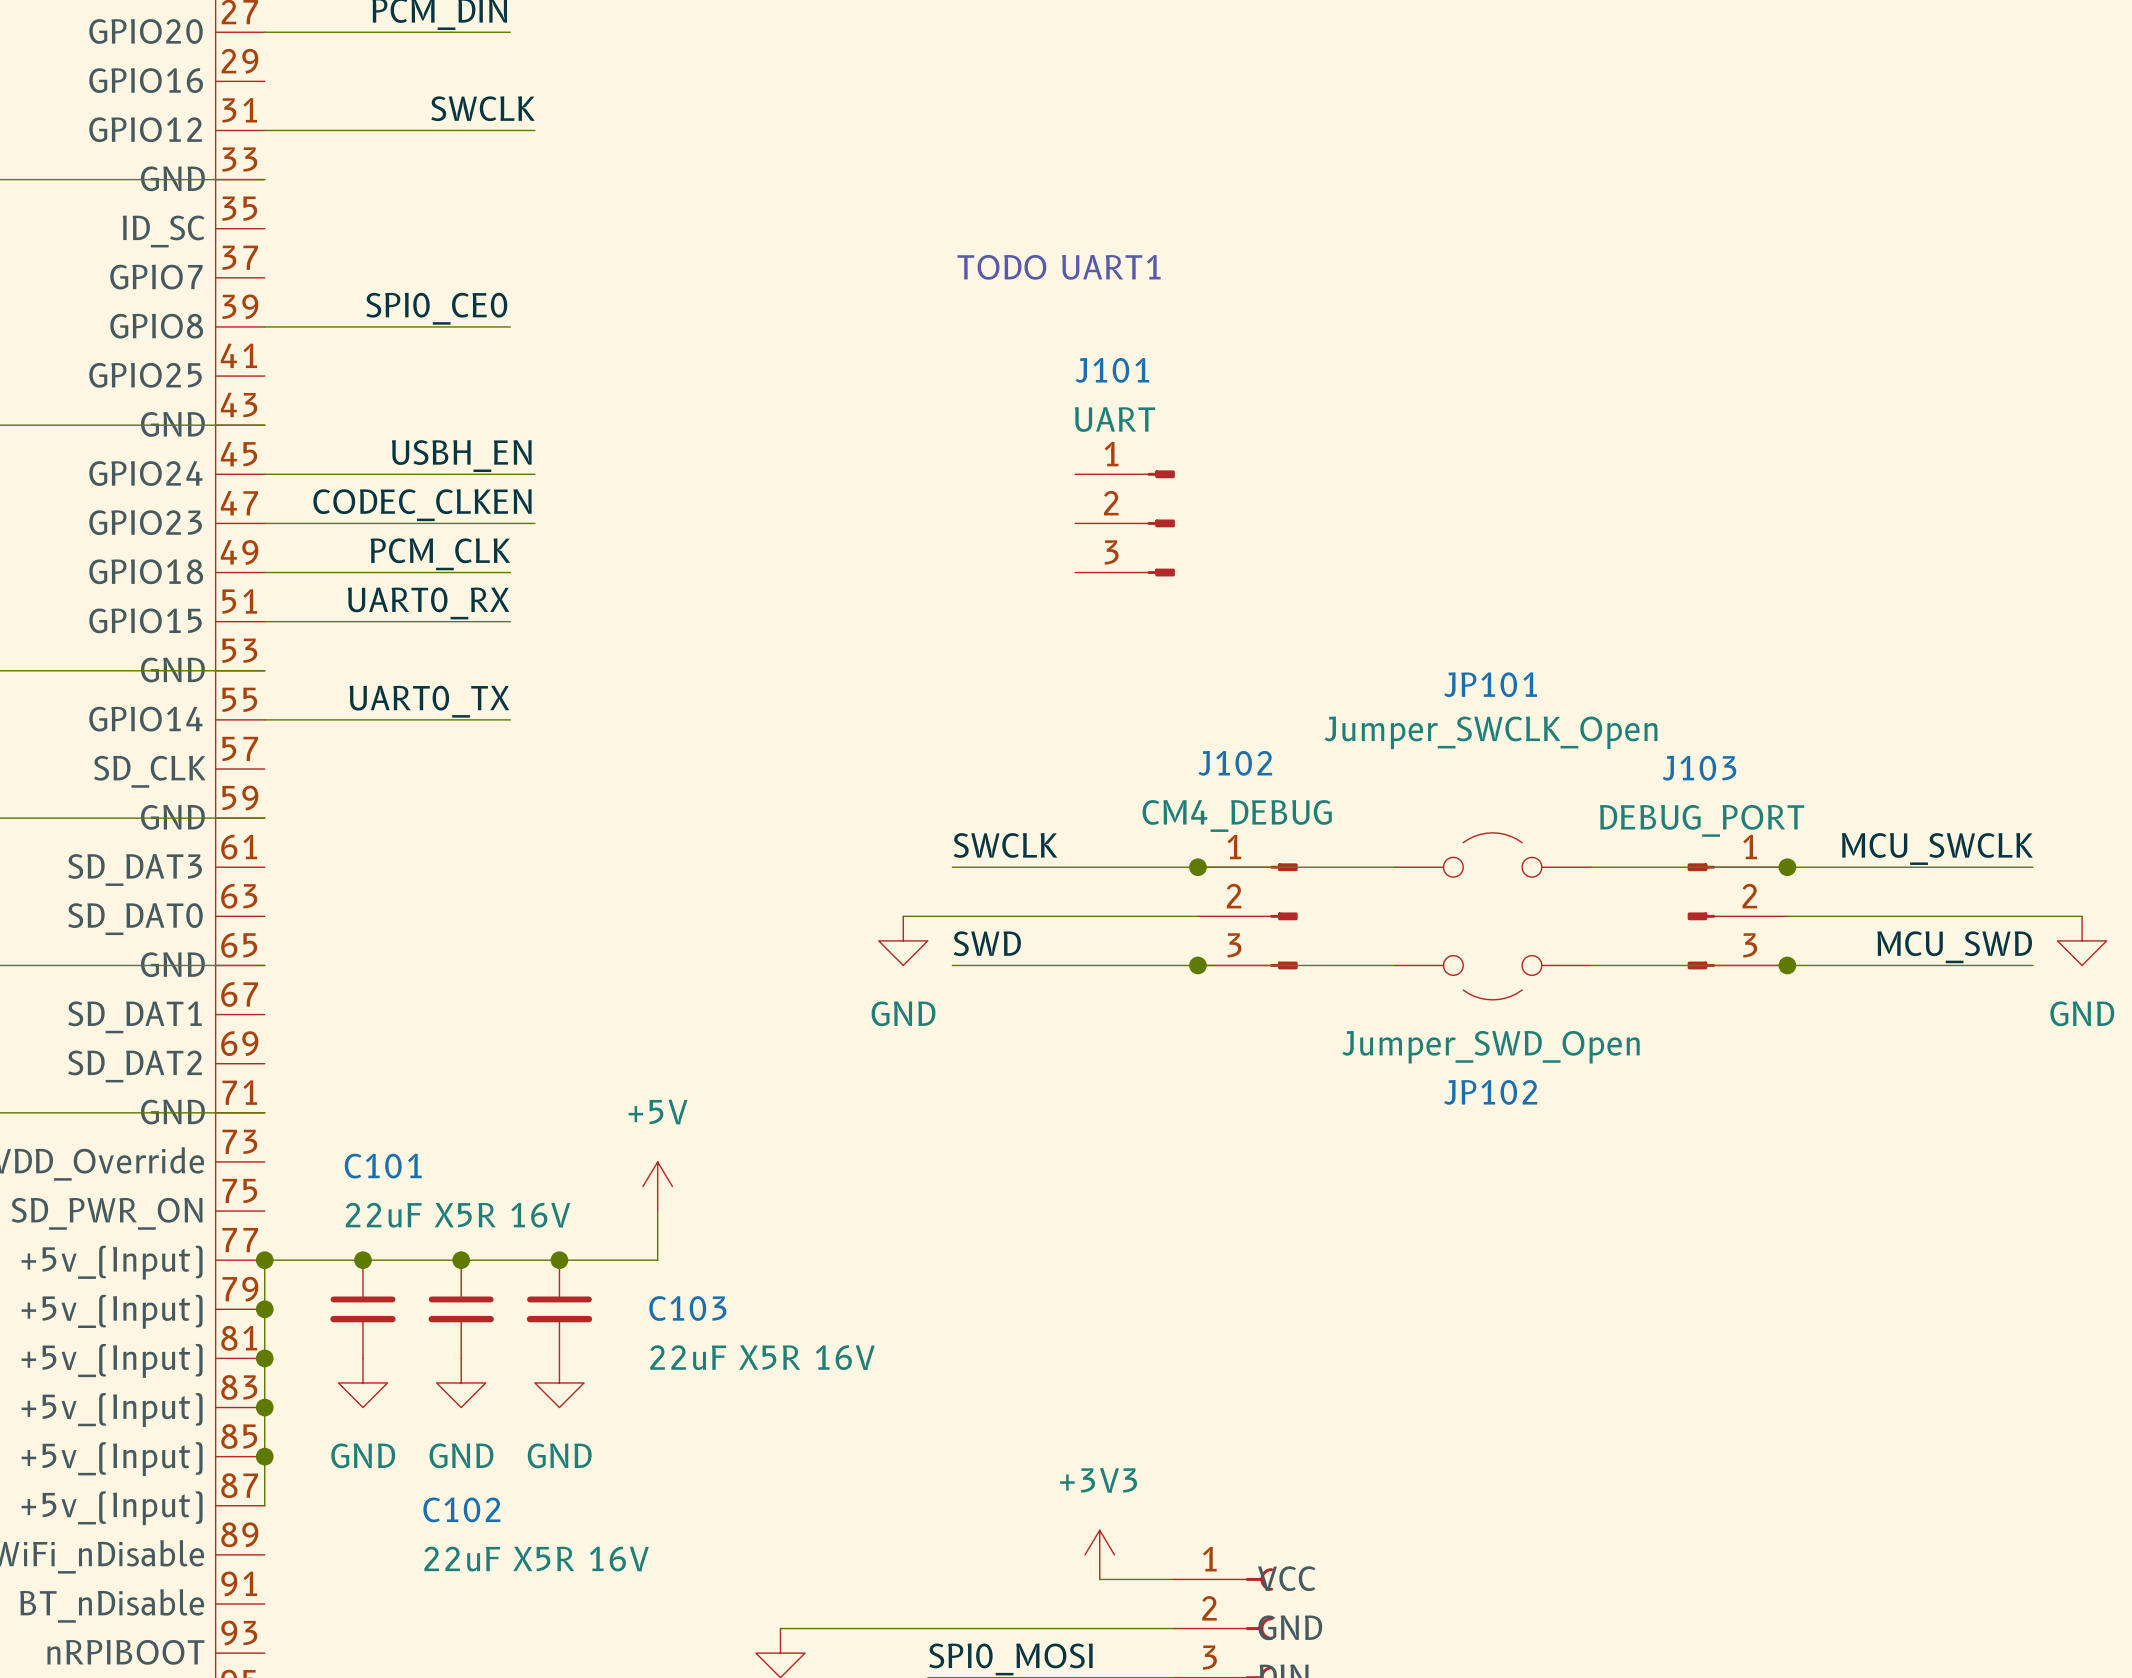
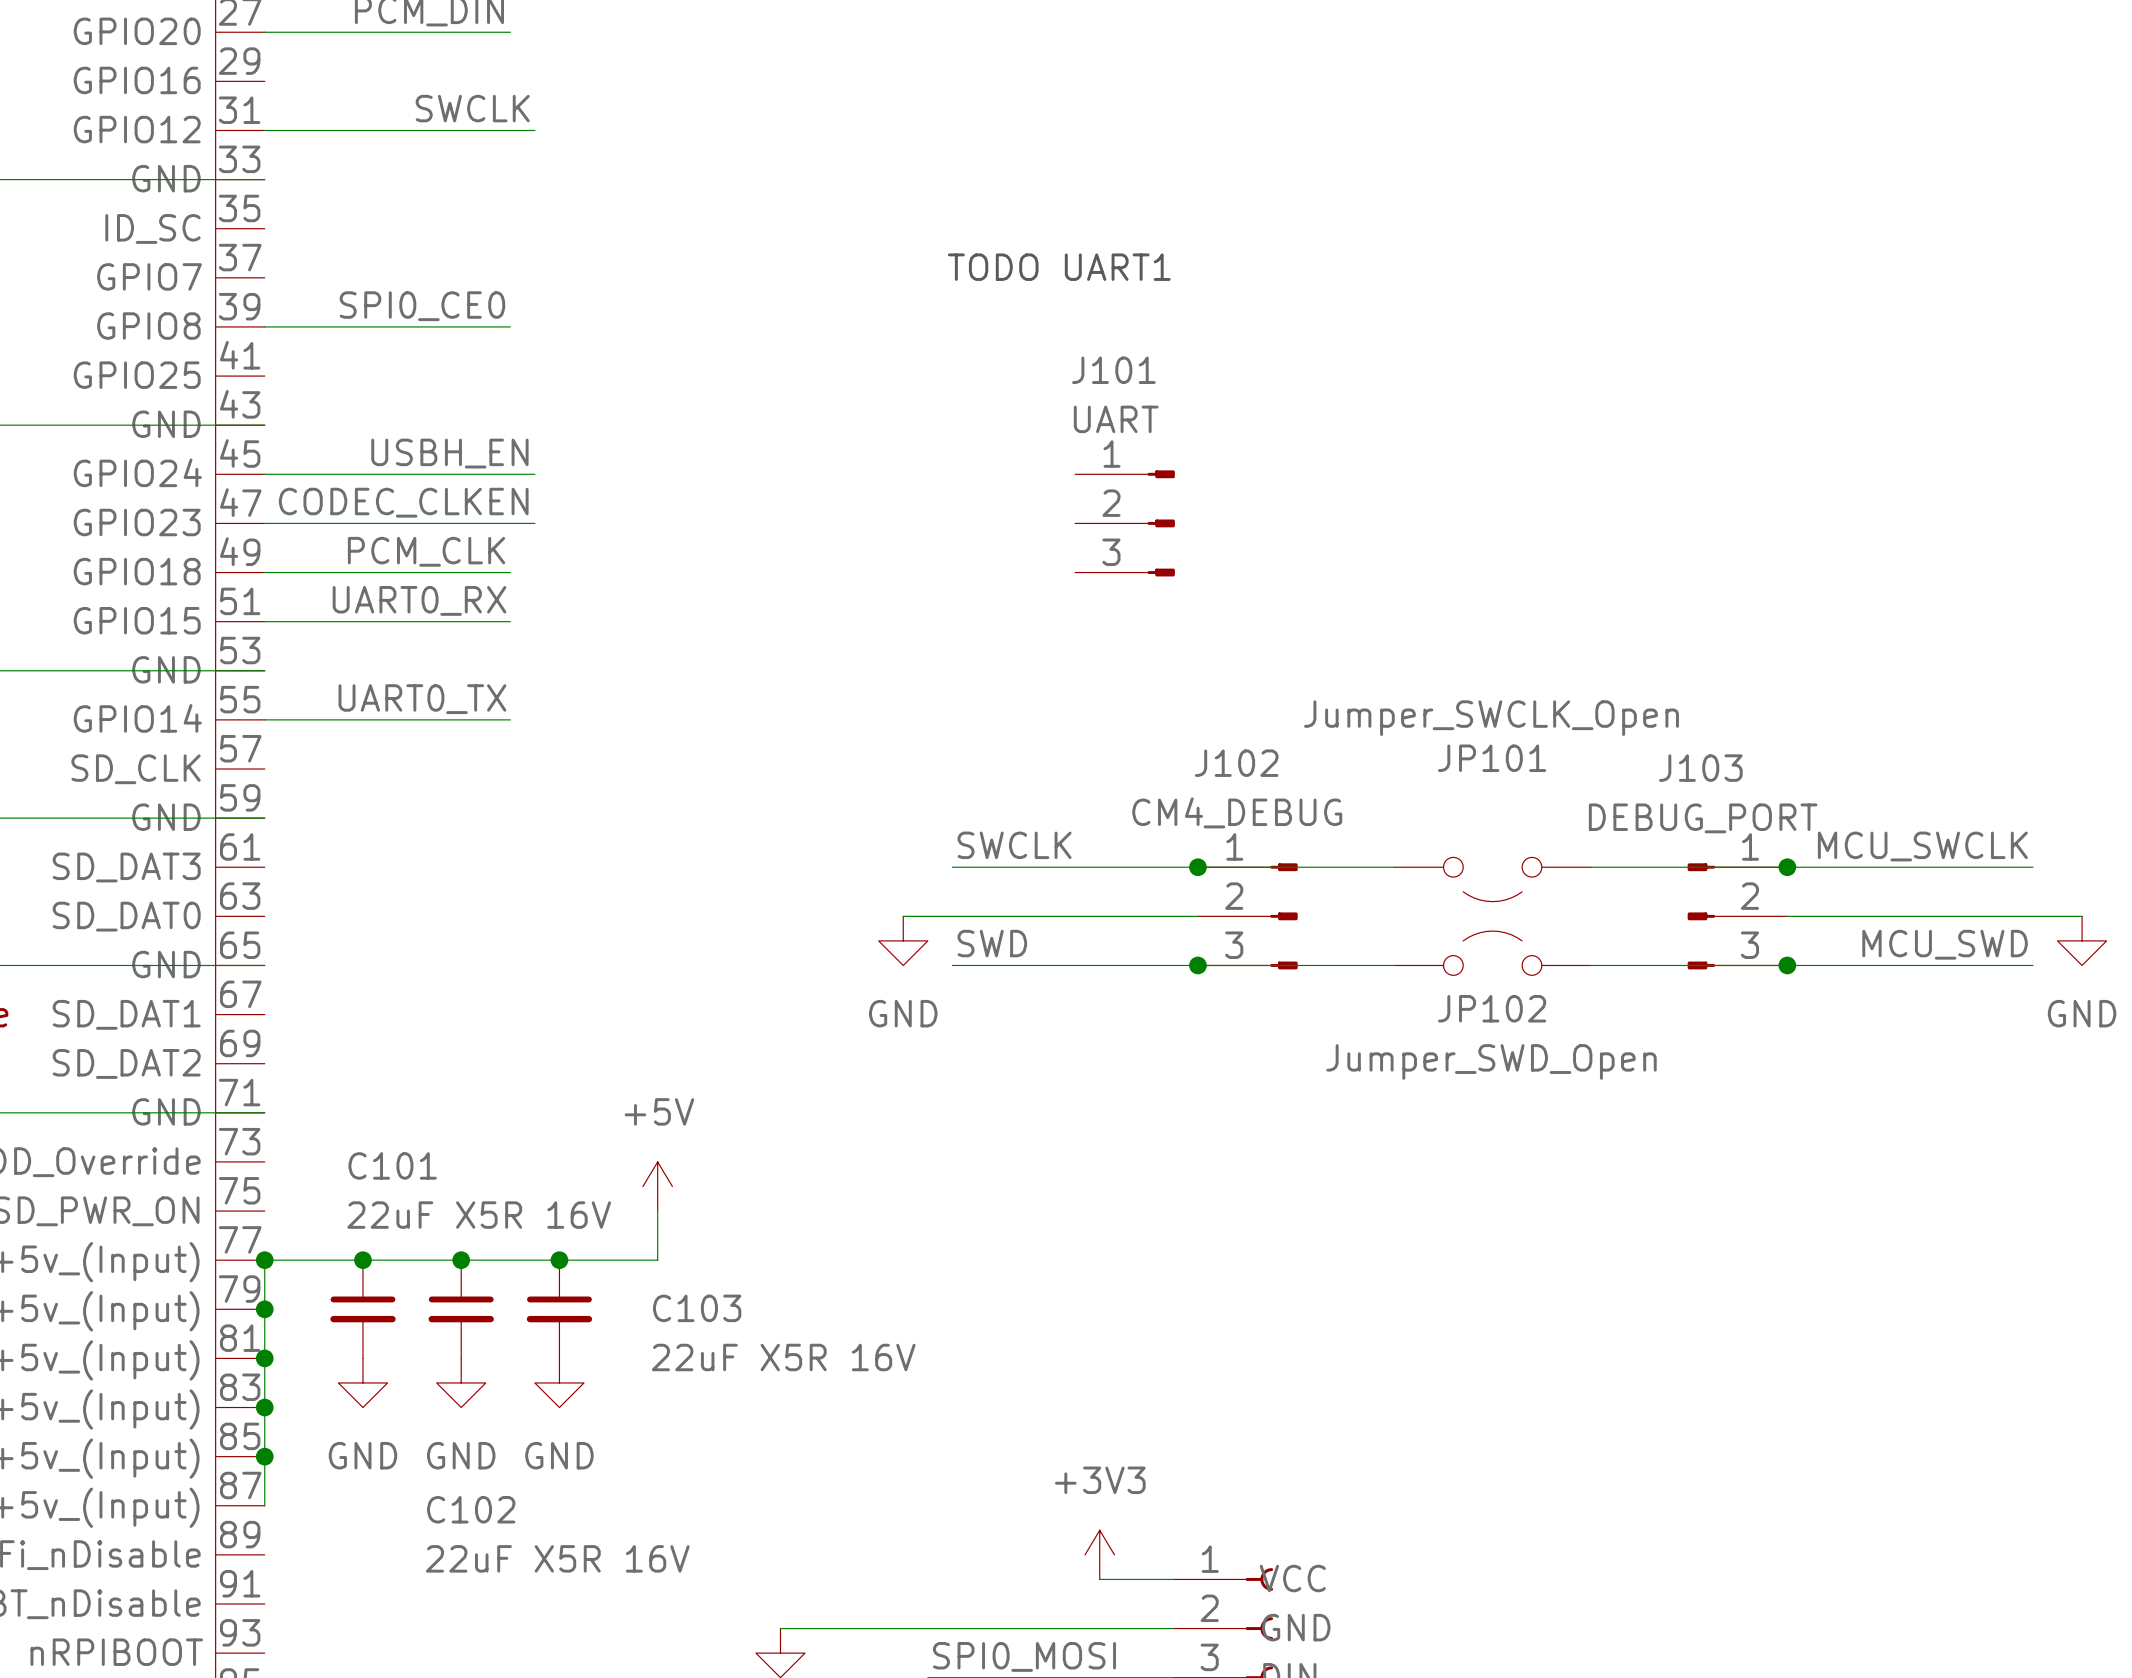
JP101 name position: JP101 (1490, 684) -> JP101 (1492, 758)
JP101 value position: Jumper_SWCLK_Open (1491, 732) -> Jumper_SWCLK_Open (1491, 718)
JP101 rotation: 0° (1492, 854) -> 180° (1492, 879)
JP102 rotation: 0° (1492, 977) -> 180° (1492, 953)
JP102 value position: Jumper_SWD_Open (1491, 1047) -> Jumper_SWD_Open (1491, 1061)
JP102 name position: JP102 (1490, 1092) -> JP102 (1492, 1008)

